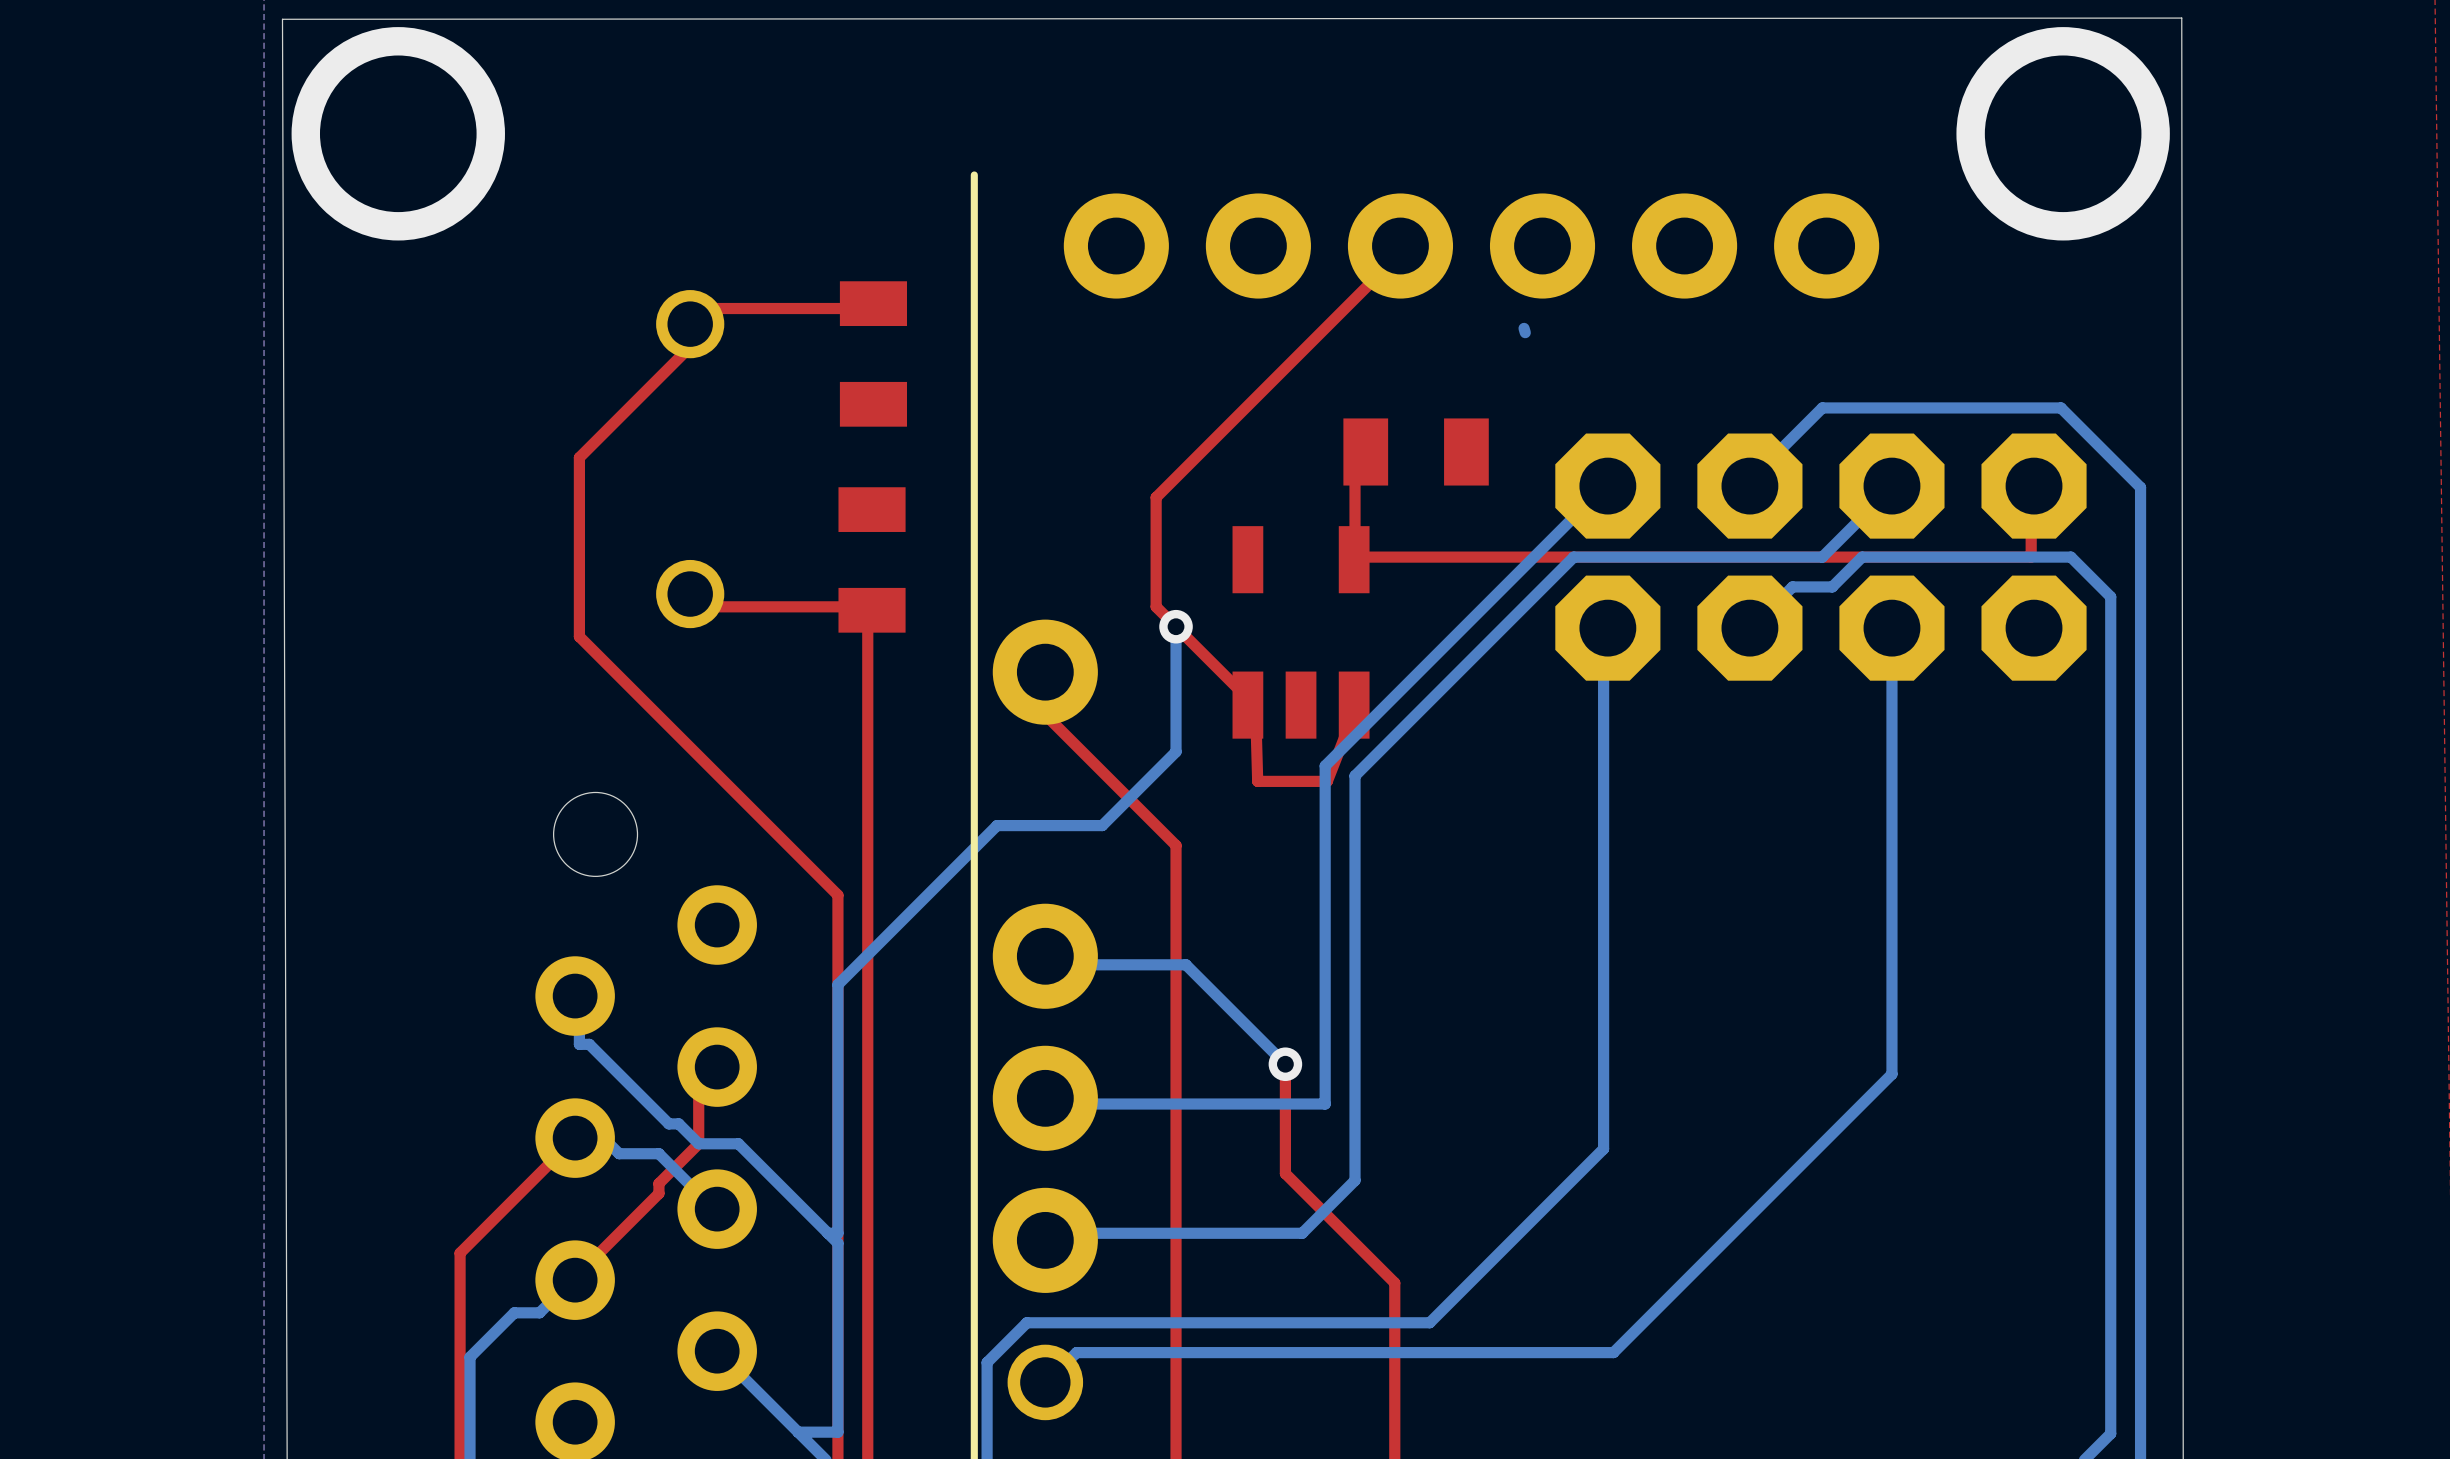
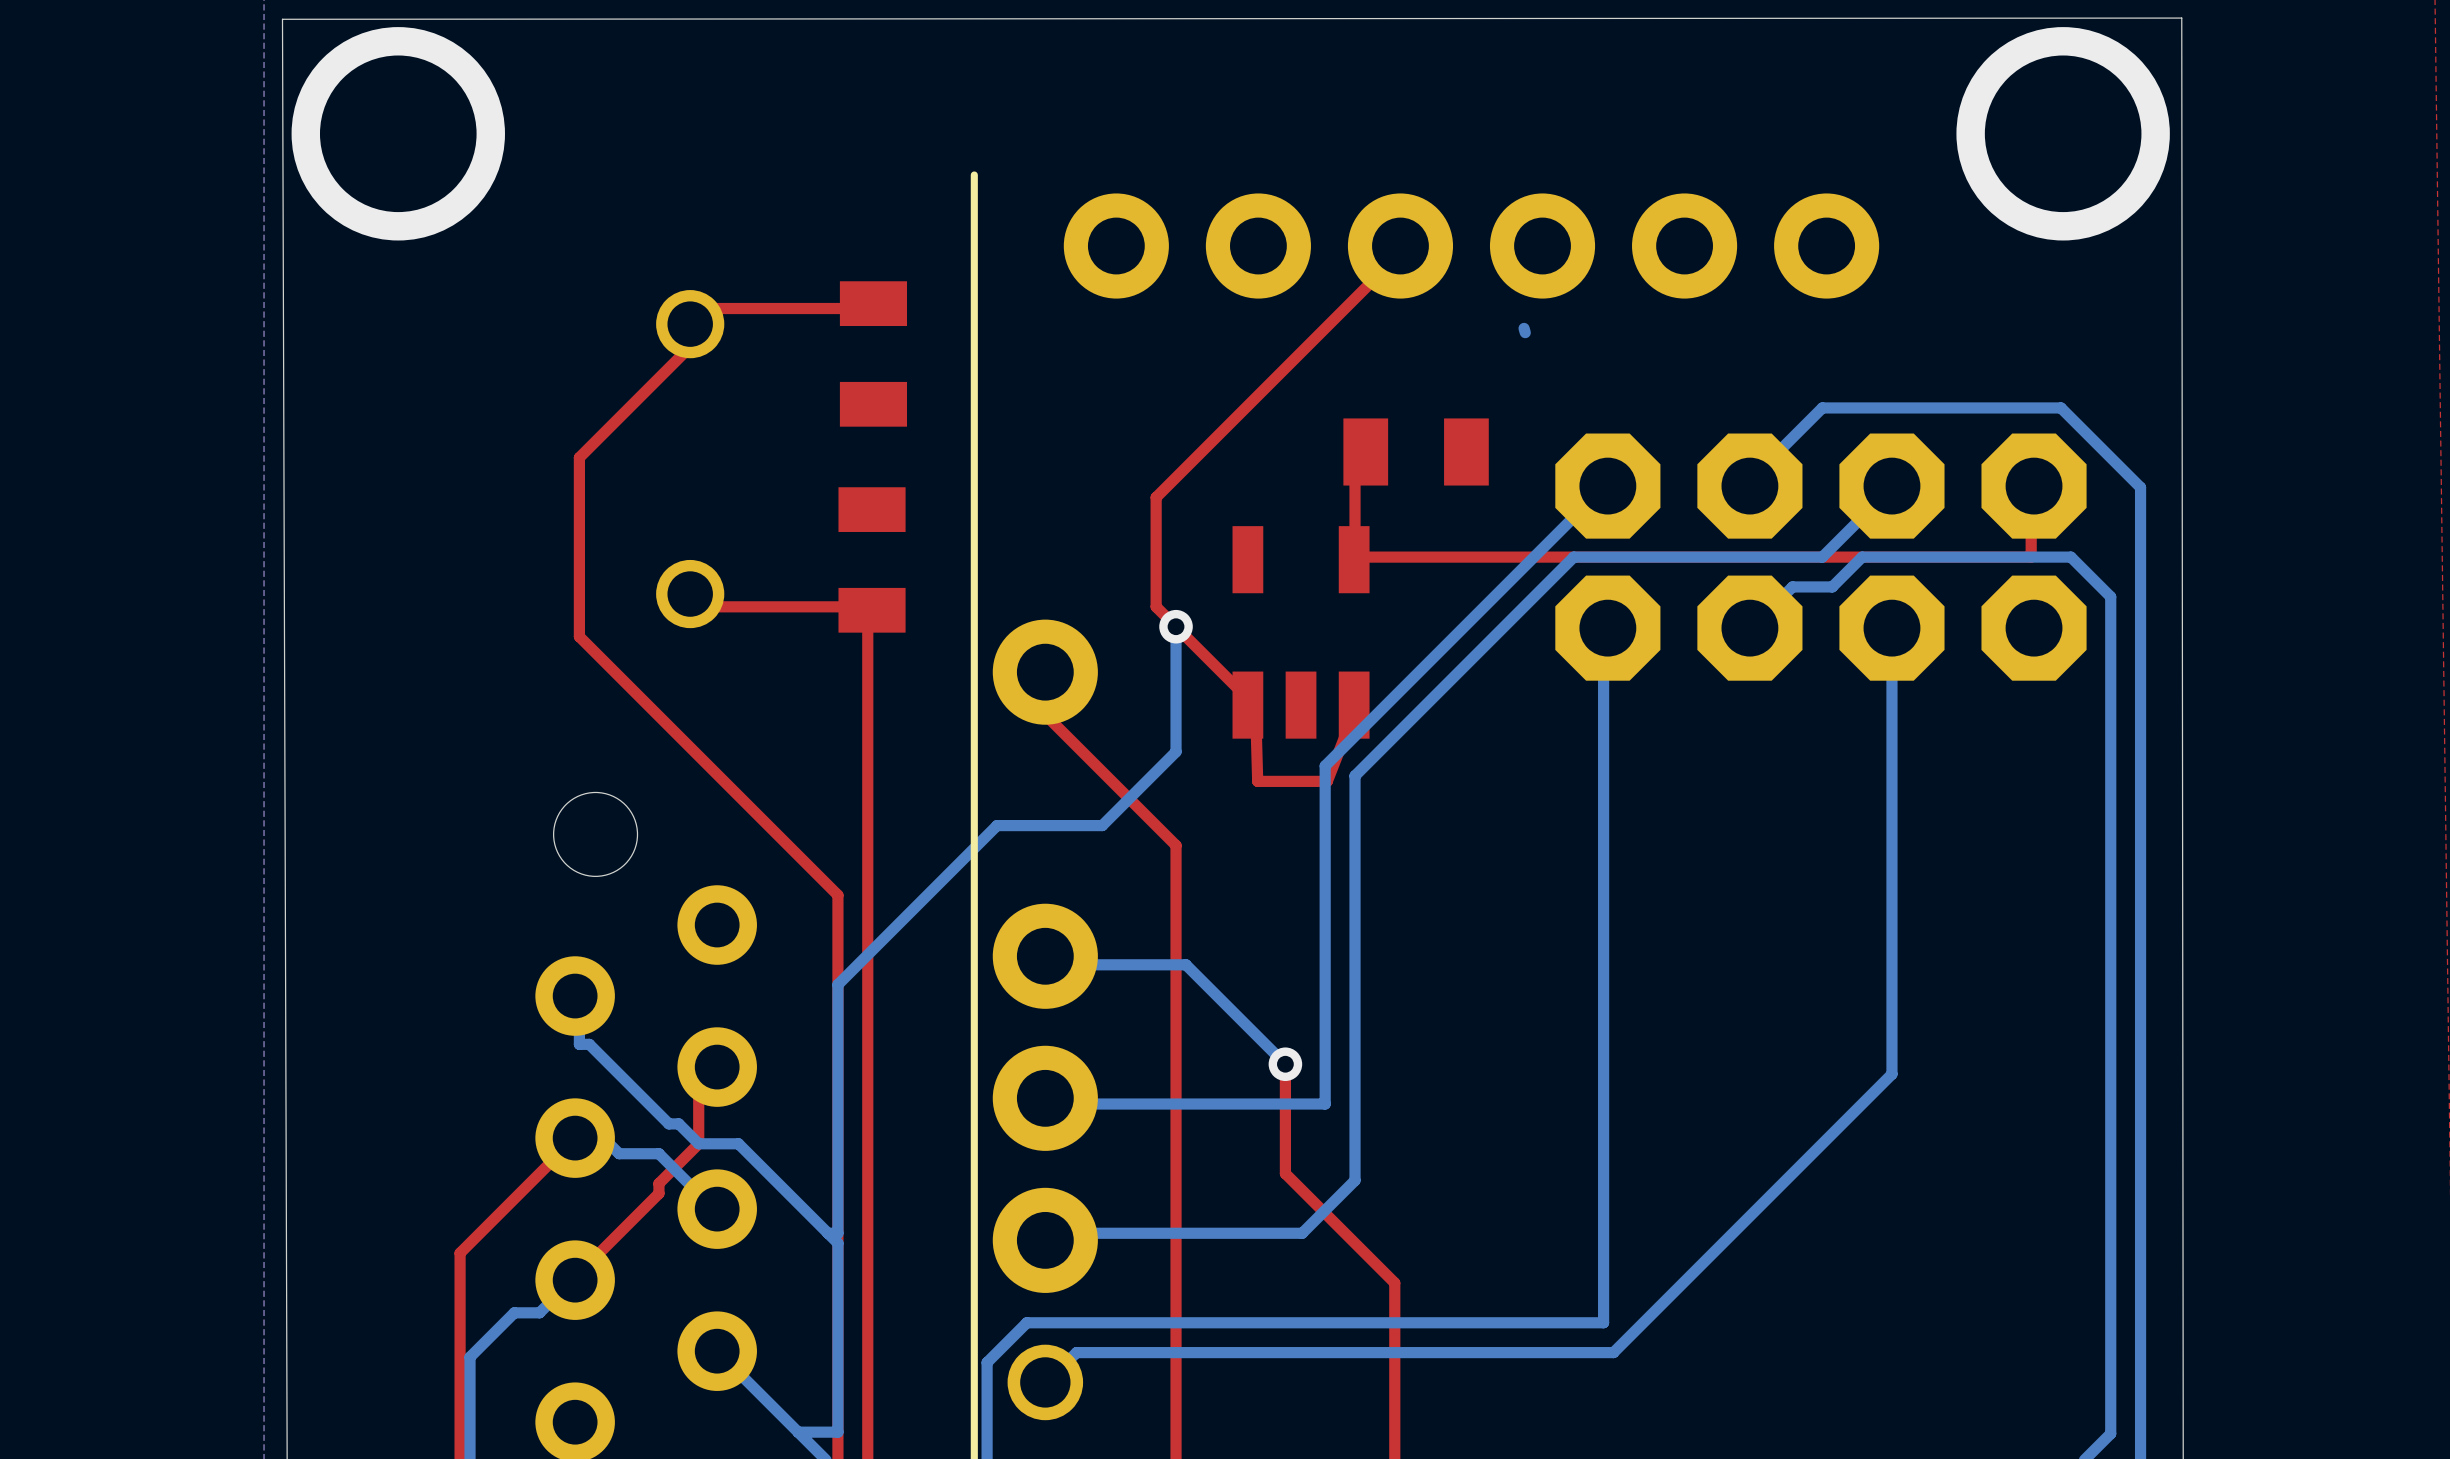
bottom track: (1603, 1148) (1429, 1322) -> (1603, 1148) (1603, 1322) (1429, 1322)

